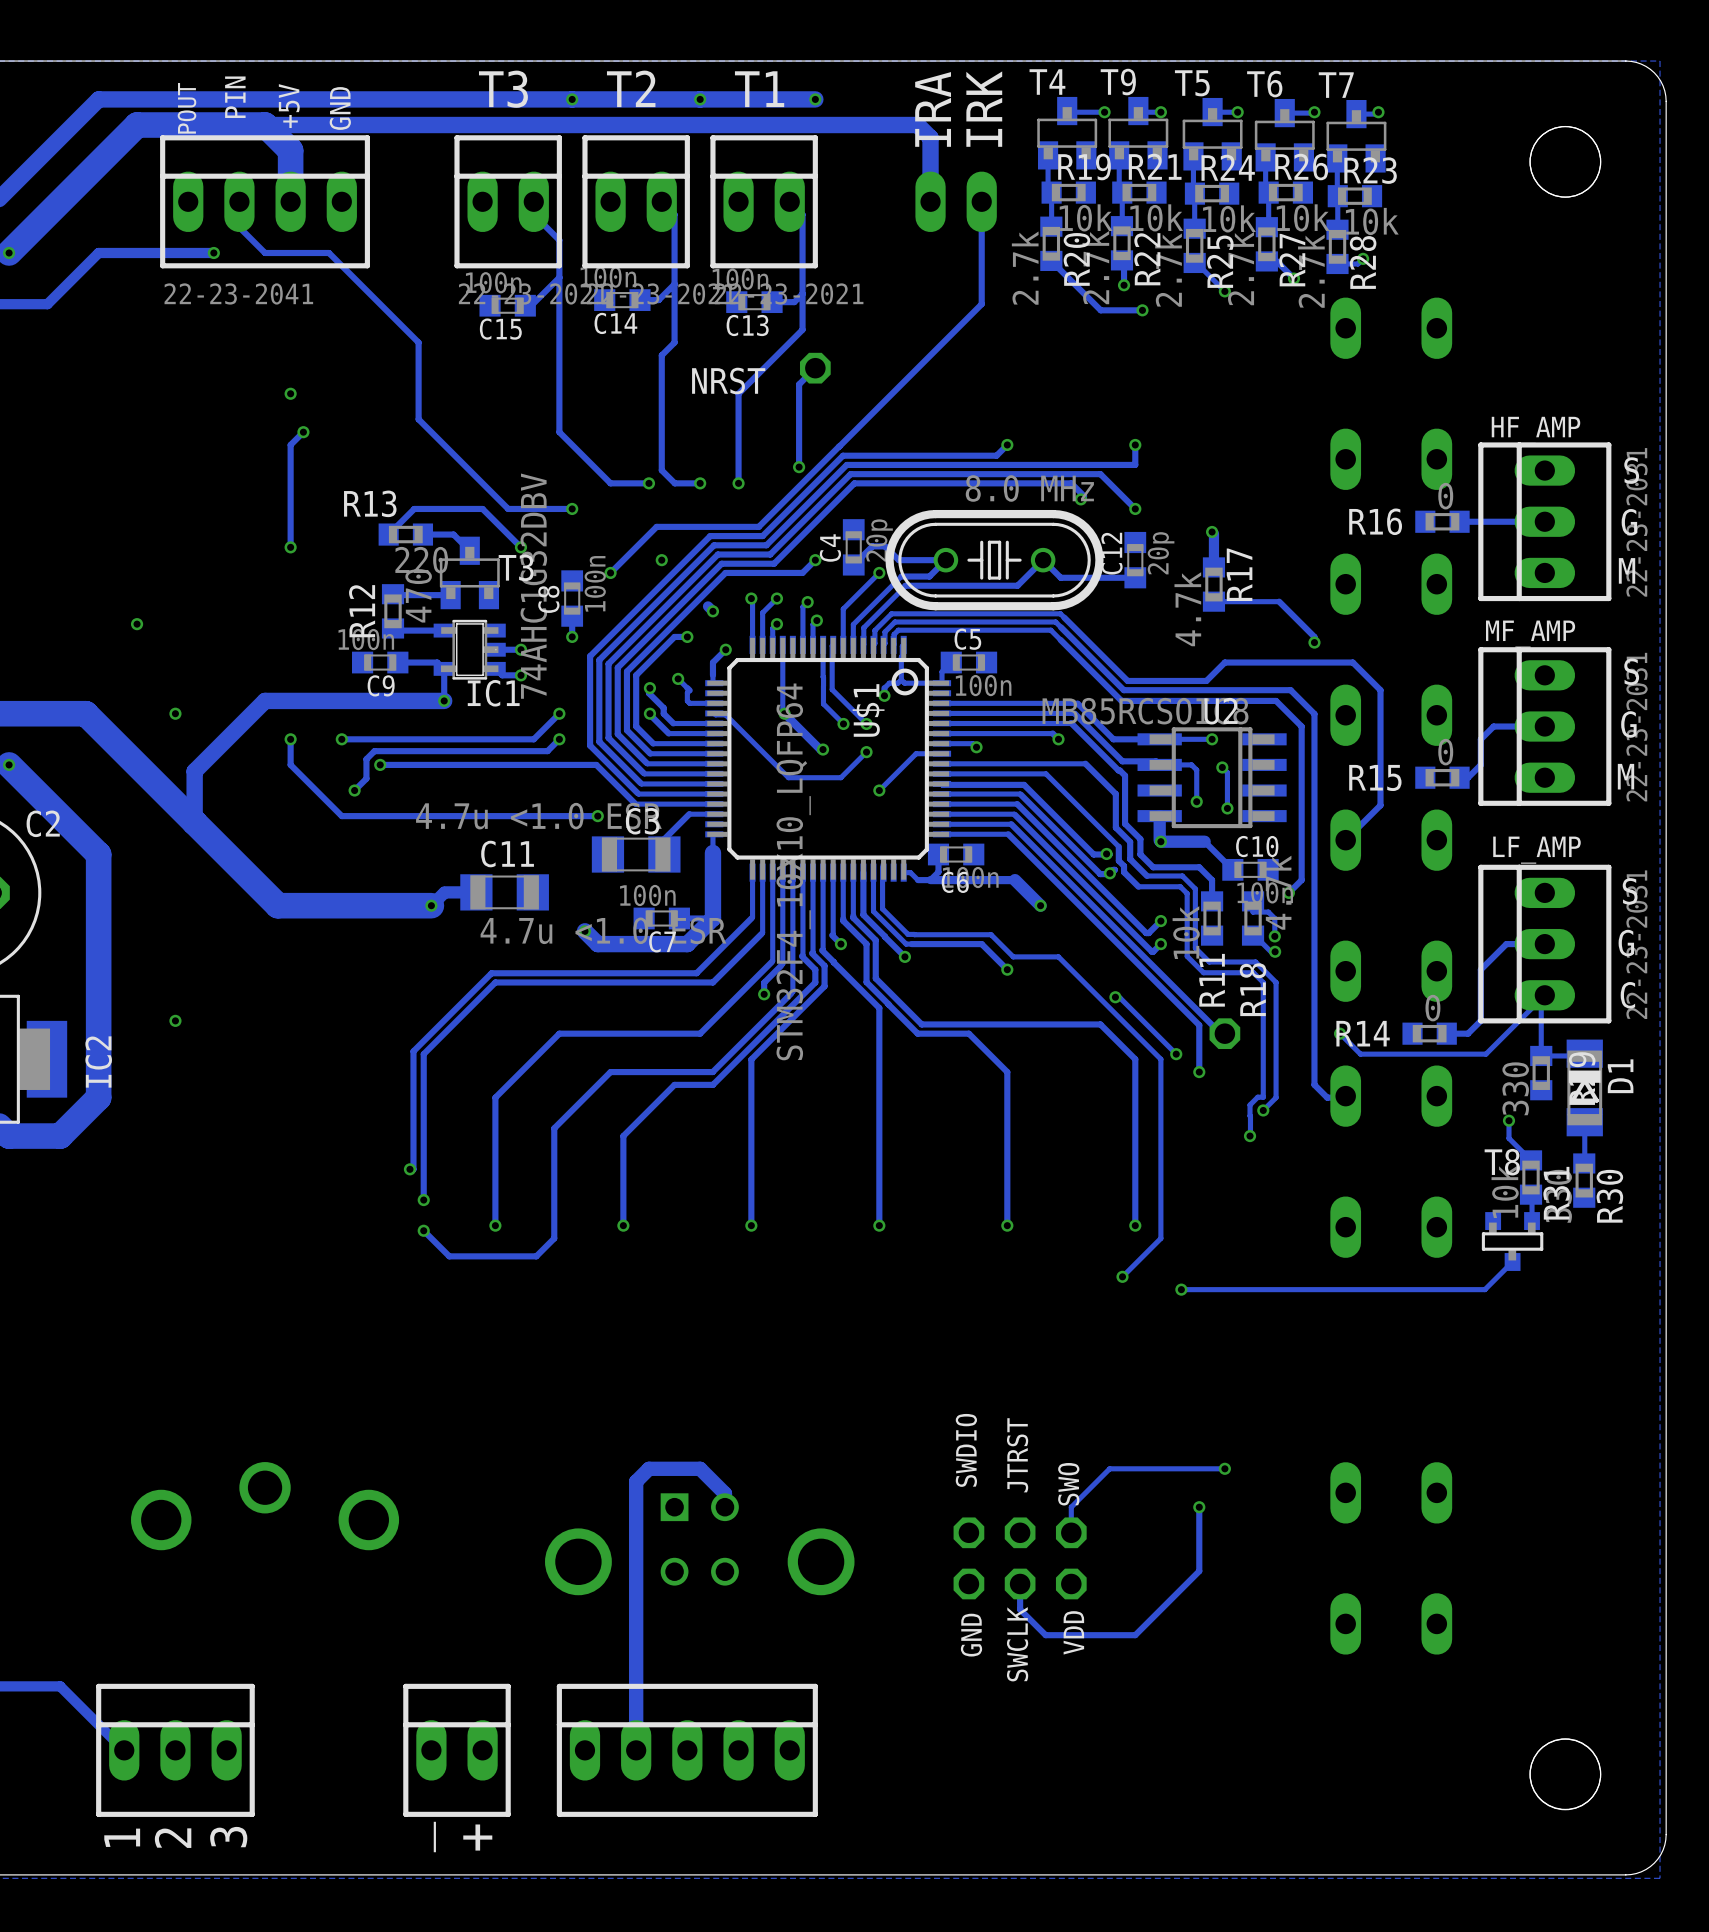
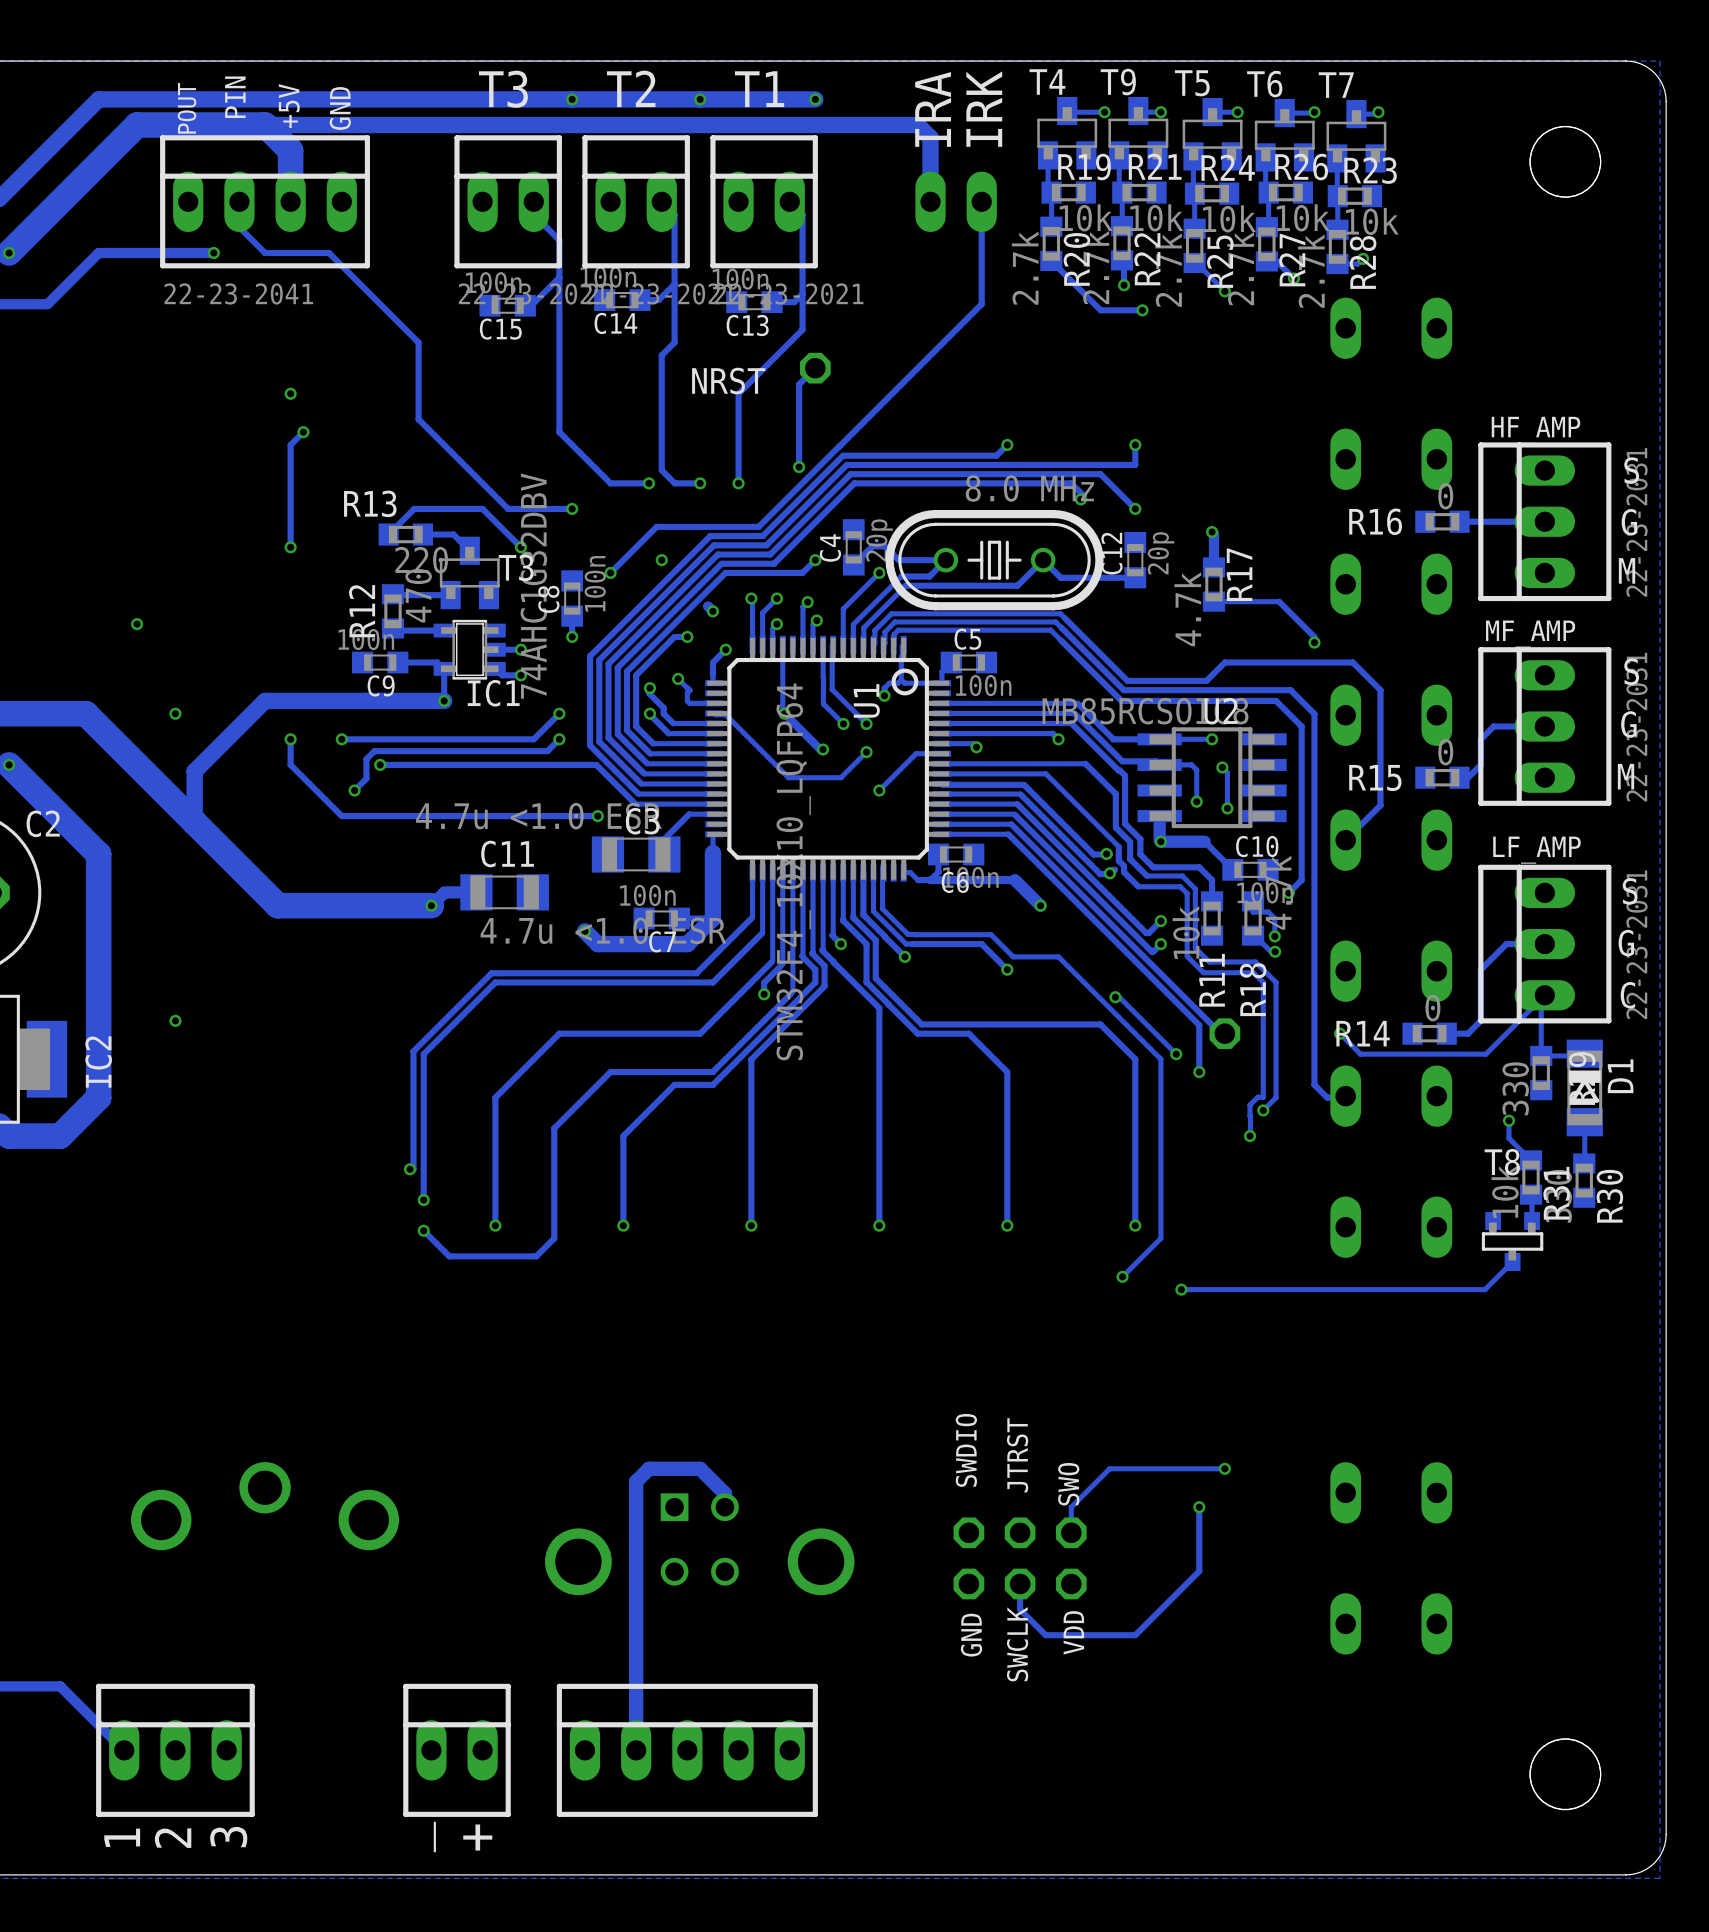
U$1 name: U$1 (868, 710) -> U1 (866, 700)

